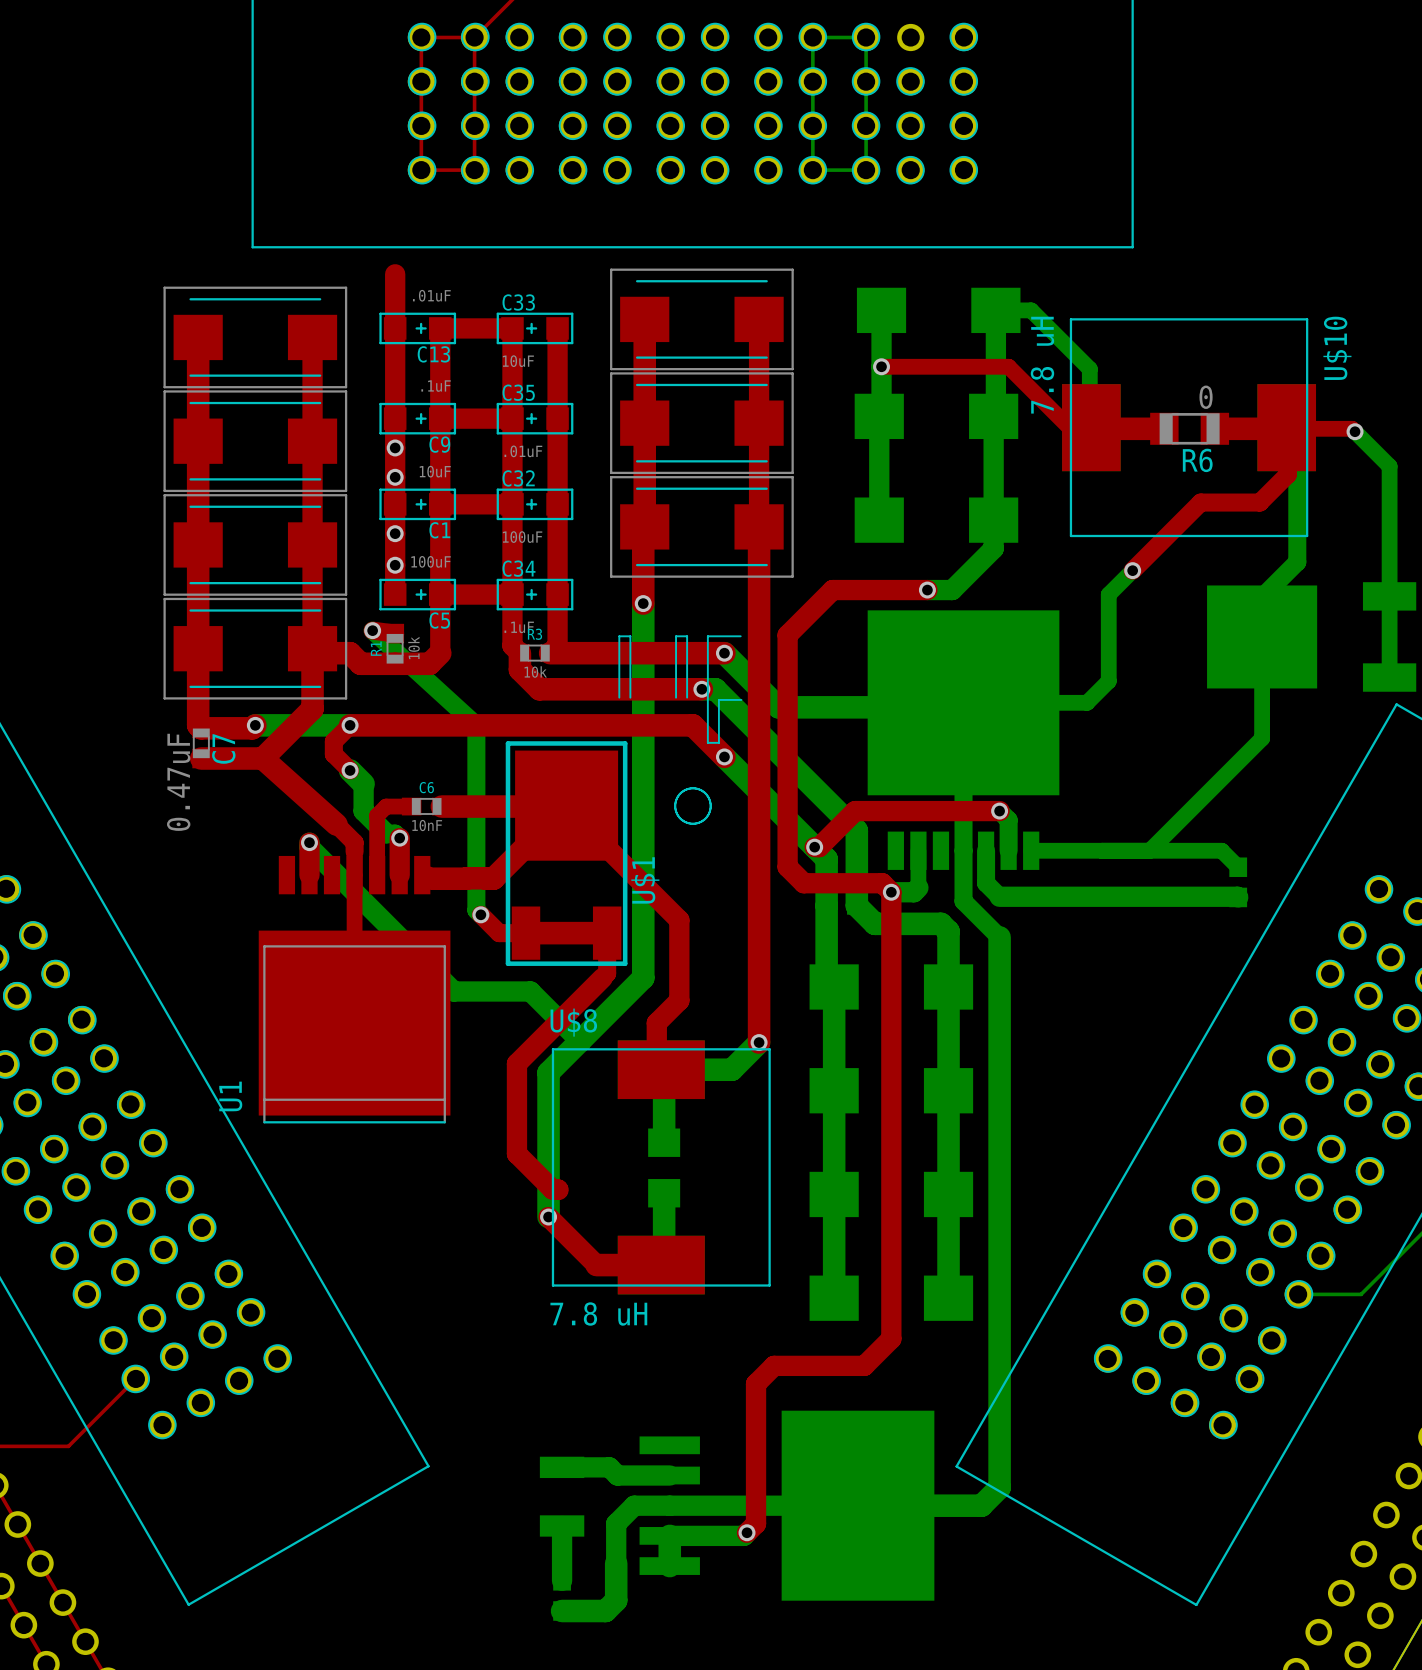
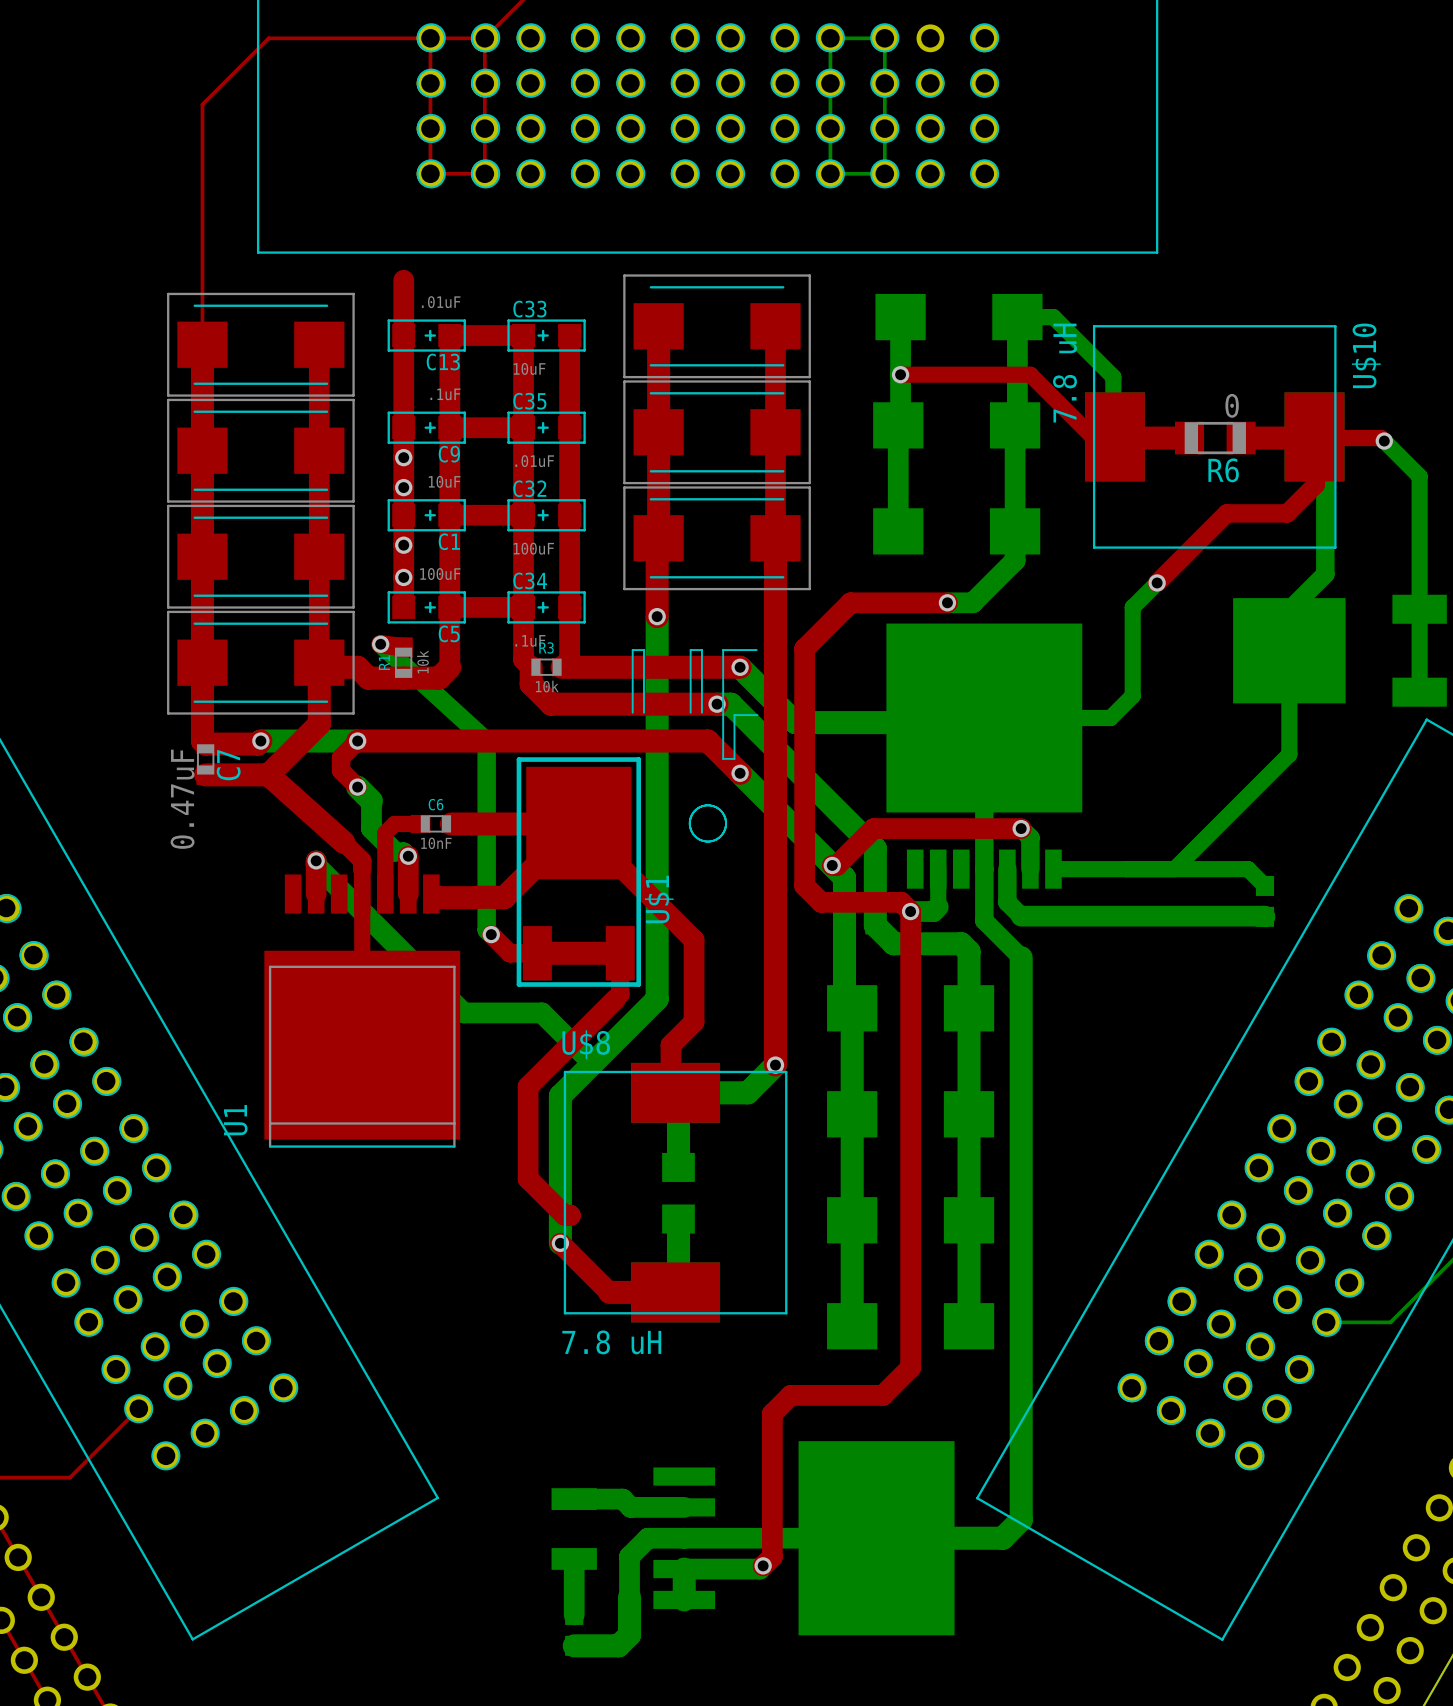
top track: none -> (430, 38) (268, 38) (202, 104) (202, 344)

